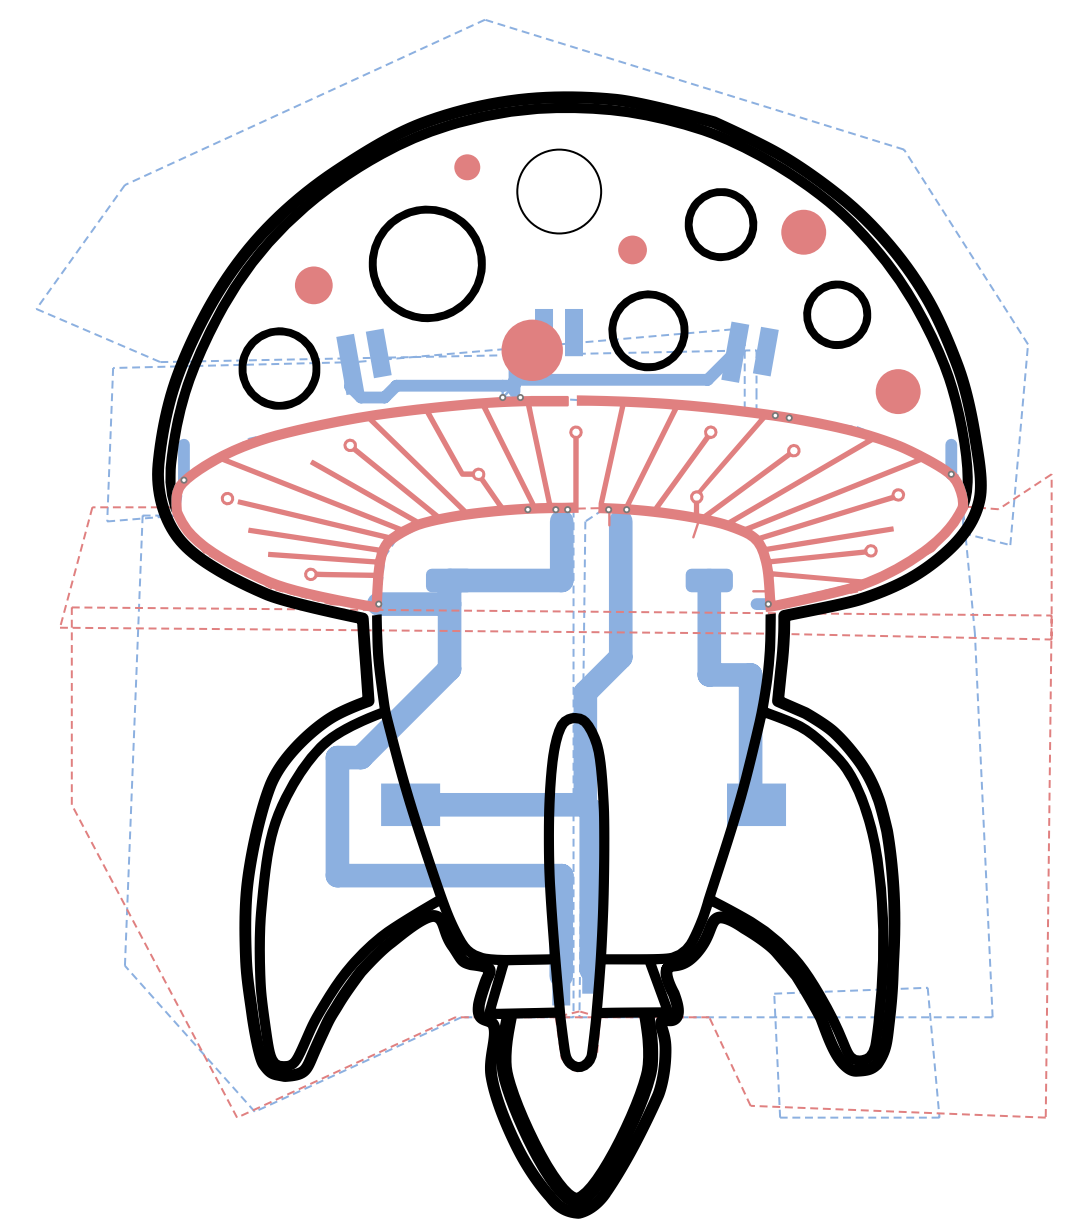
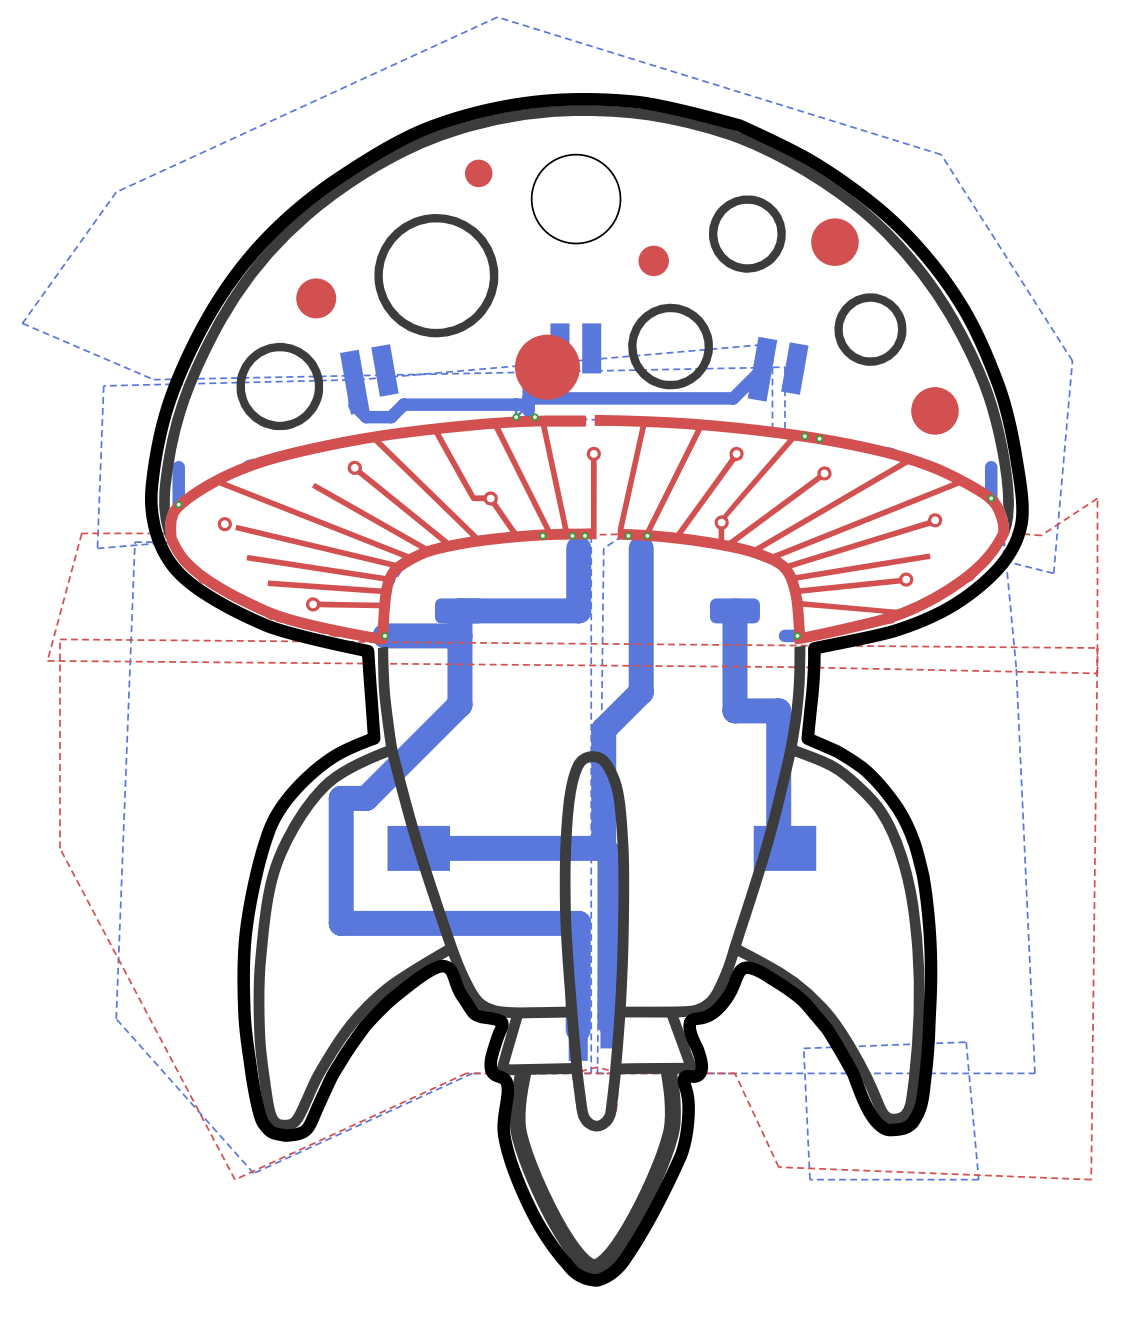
top track: (609, 508) (609, 525) -> none
top track: (699, 519) (693, 537) -> none
top track: (753, 591) (771, 591) -> none

